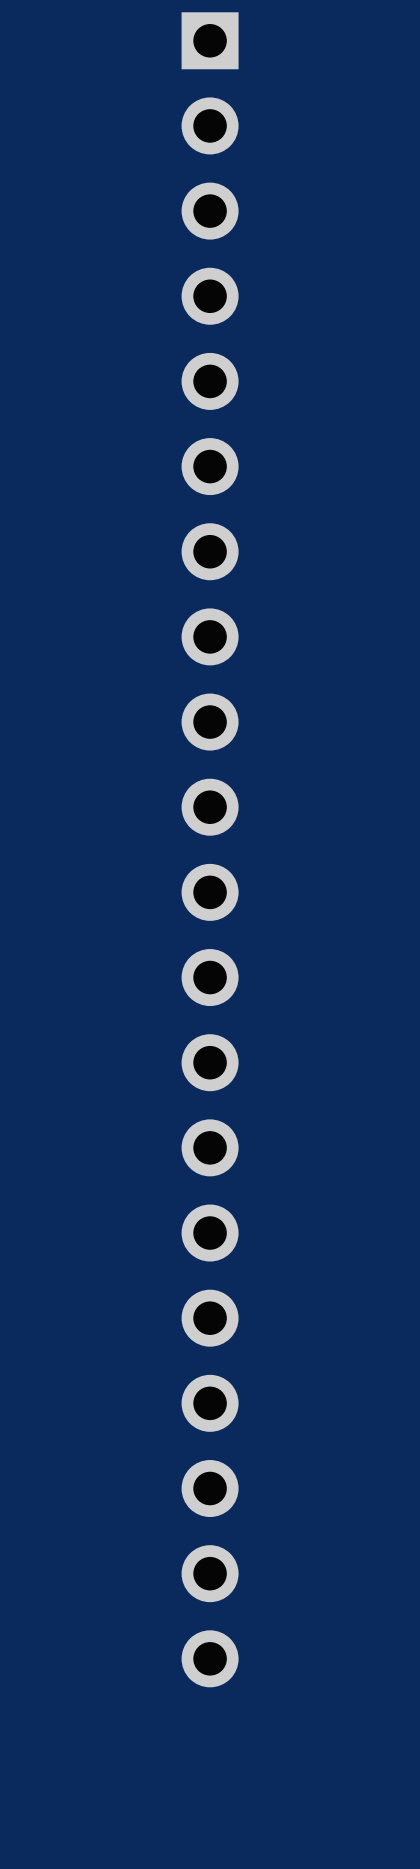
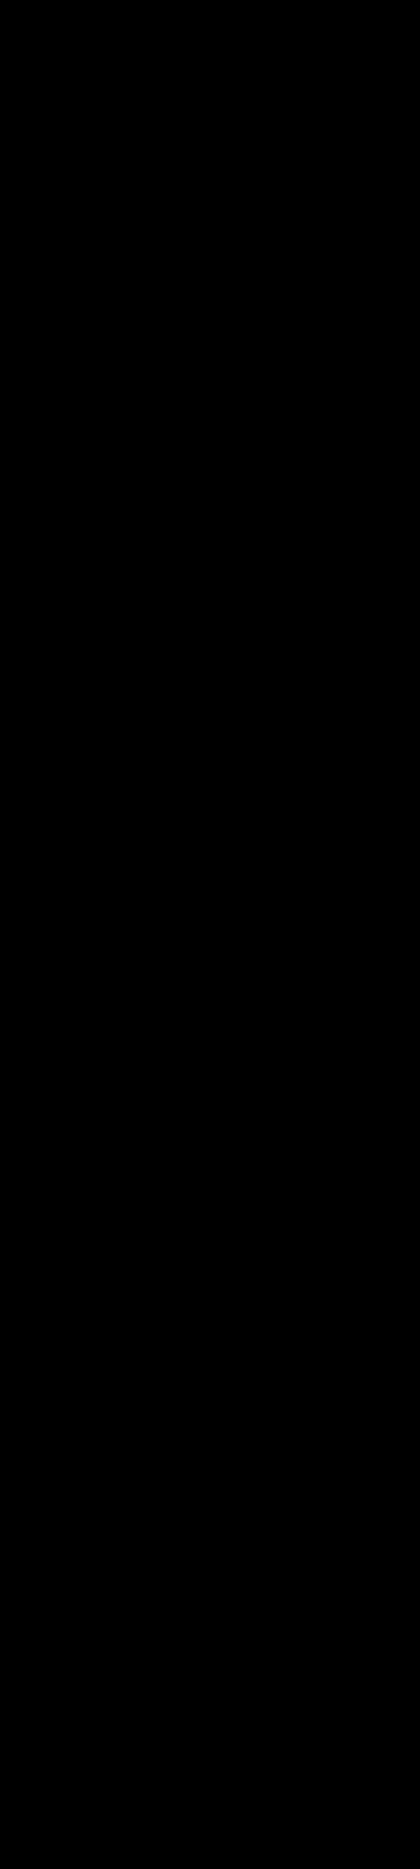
part: (210, 849) -> none

